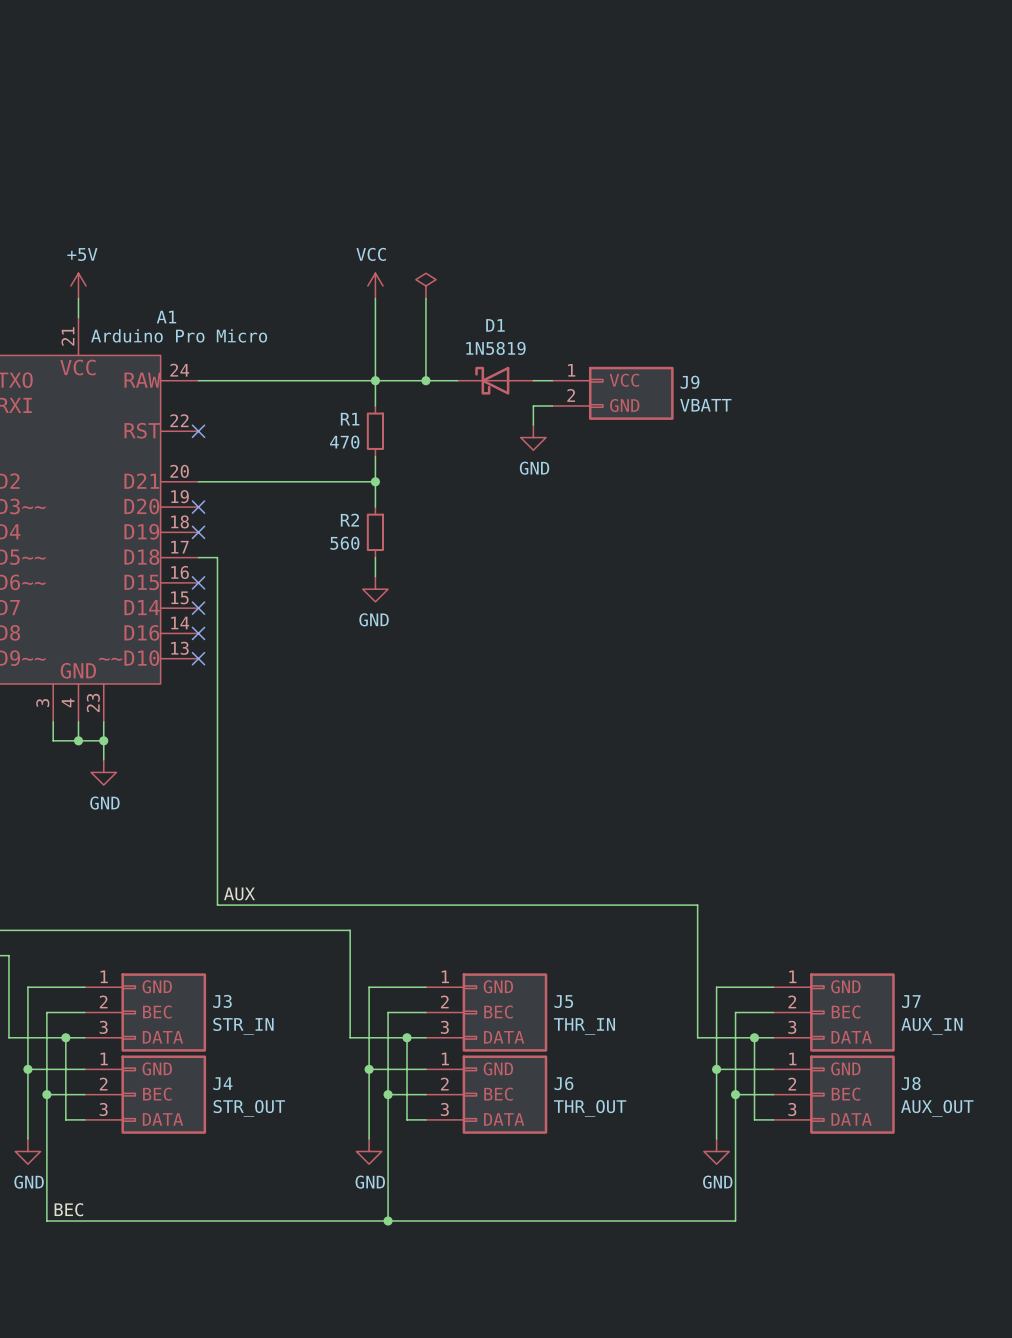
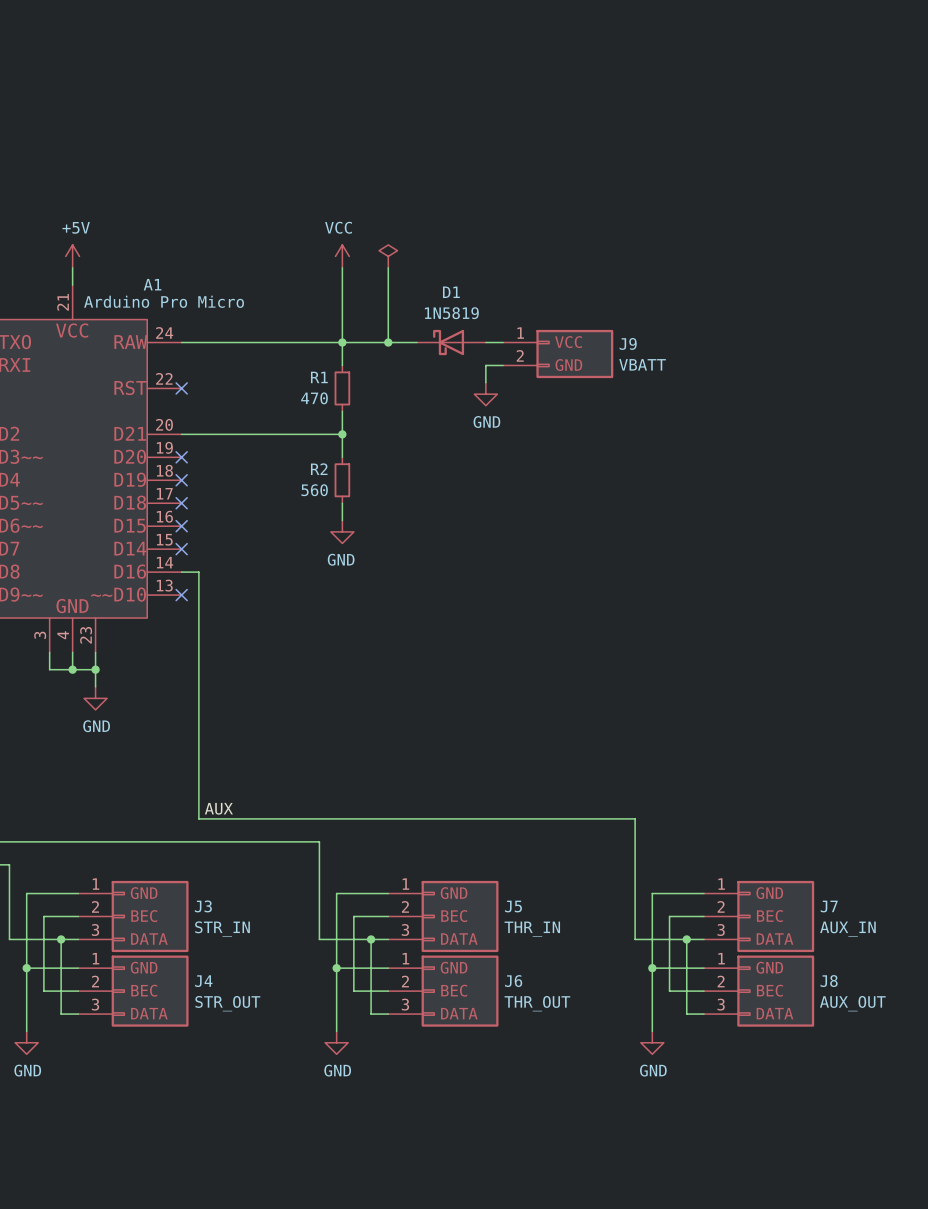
wire: (198, 557) (217, 557) (217, 633) -> (181, 572) (198, 572)
no-connect mark: none -> (181, 503)
no-connect mark: (198, 633) -> none
wire: (46, 1094) (46, 1221) (735, 1221) (735, 1094) -> none
junction: (46, 1094) -> none
wire: (388, 1094) (388, 1221) -> none
junction: (388, 1094) -> none
junction: (735, 1094) -> none
label: BEC (68, 1209) -> none
junction: (388, 1221) -> none

